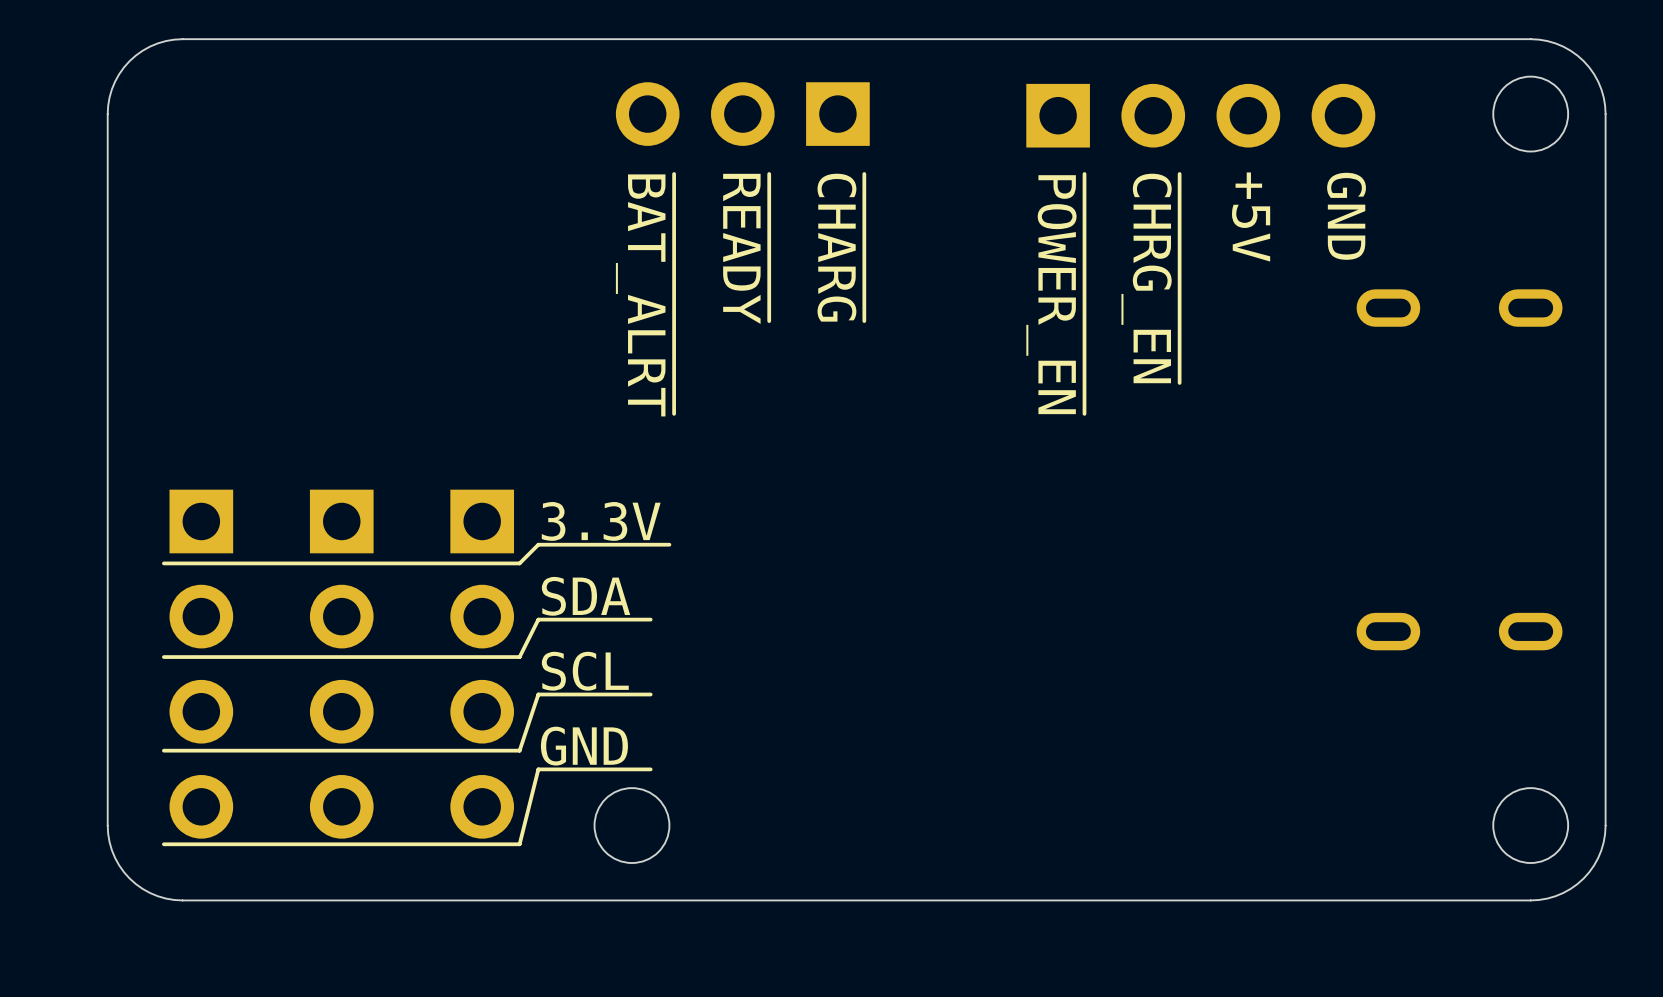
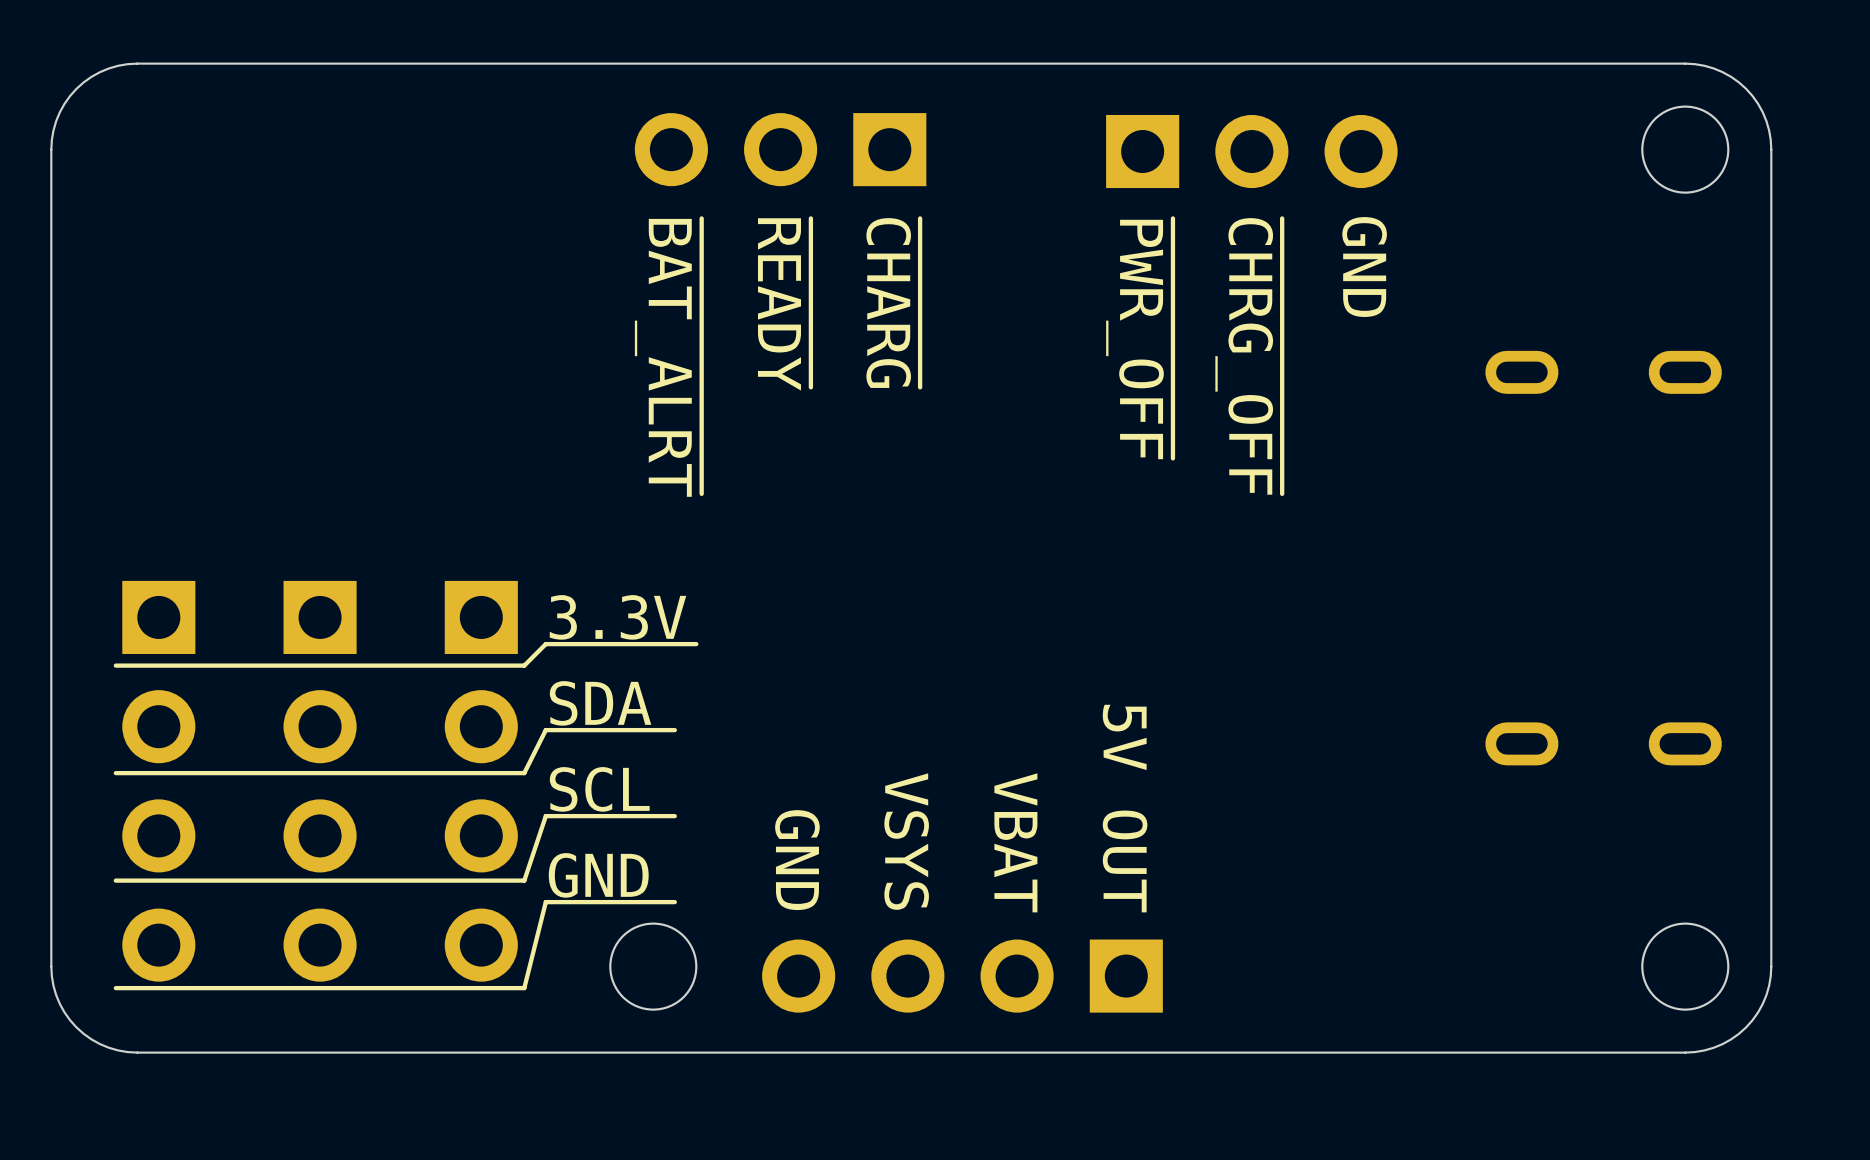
part rotation: 0° (1200, 115) -> 180° (962, 976)
part position: (1200, 115) -> (962, 976)
text position: GND (1346, 216) -> GND (797, 860)
text: +5V (1251, 217) -> GND (1364, 267)
text: ~{CHRG_EN} (1150, 278) -> ~{CHRG_OFF} (1248, 356)
text: ~{POWER_EN} (1055, 294) -> ~{PWR_OFF} (1139, 338)
text: none -> 5V OUT (1125, 808)
text: none -> VSYS (906, 841)
text: none -> VBAT (1015, 842)

